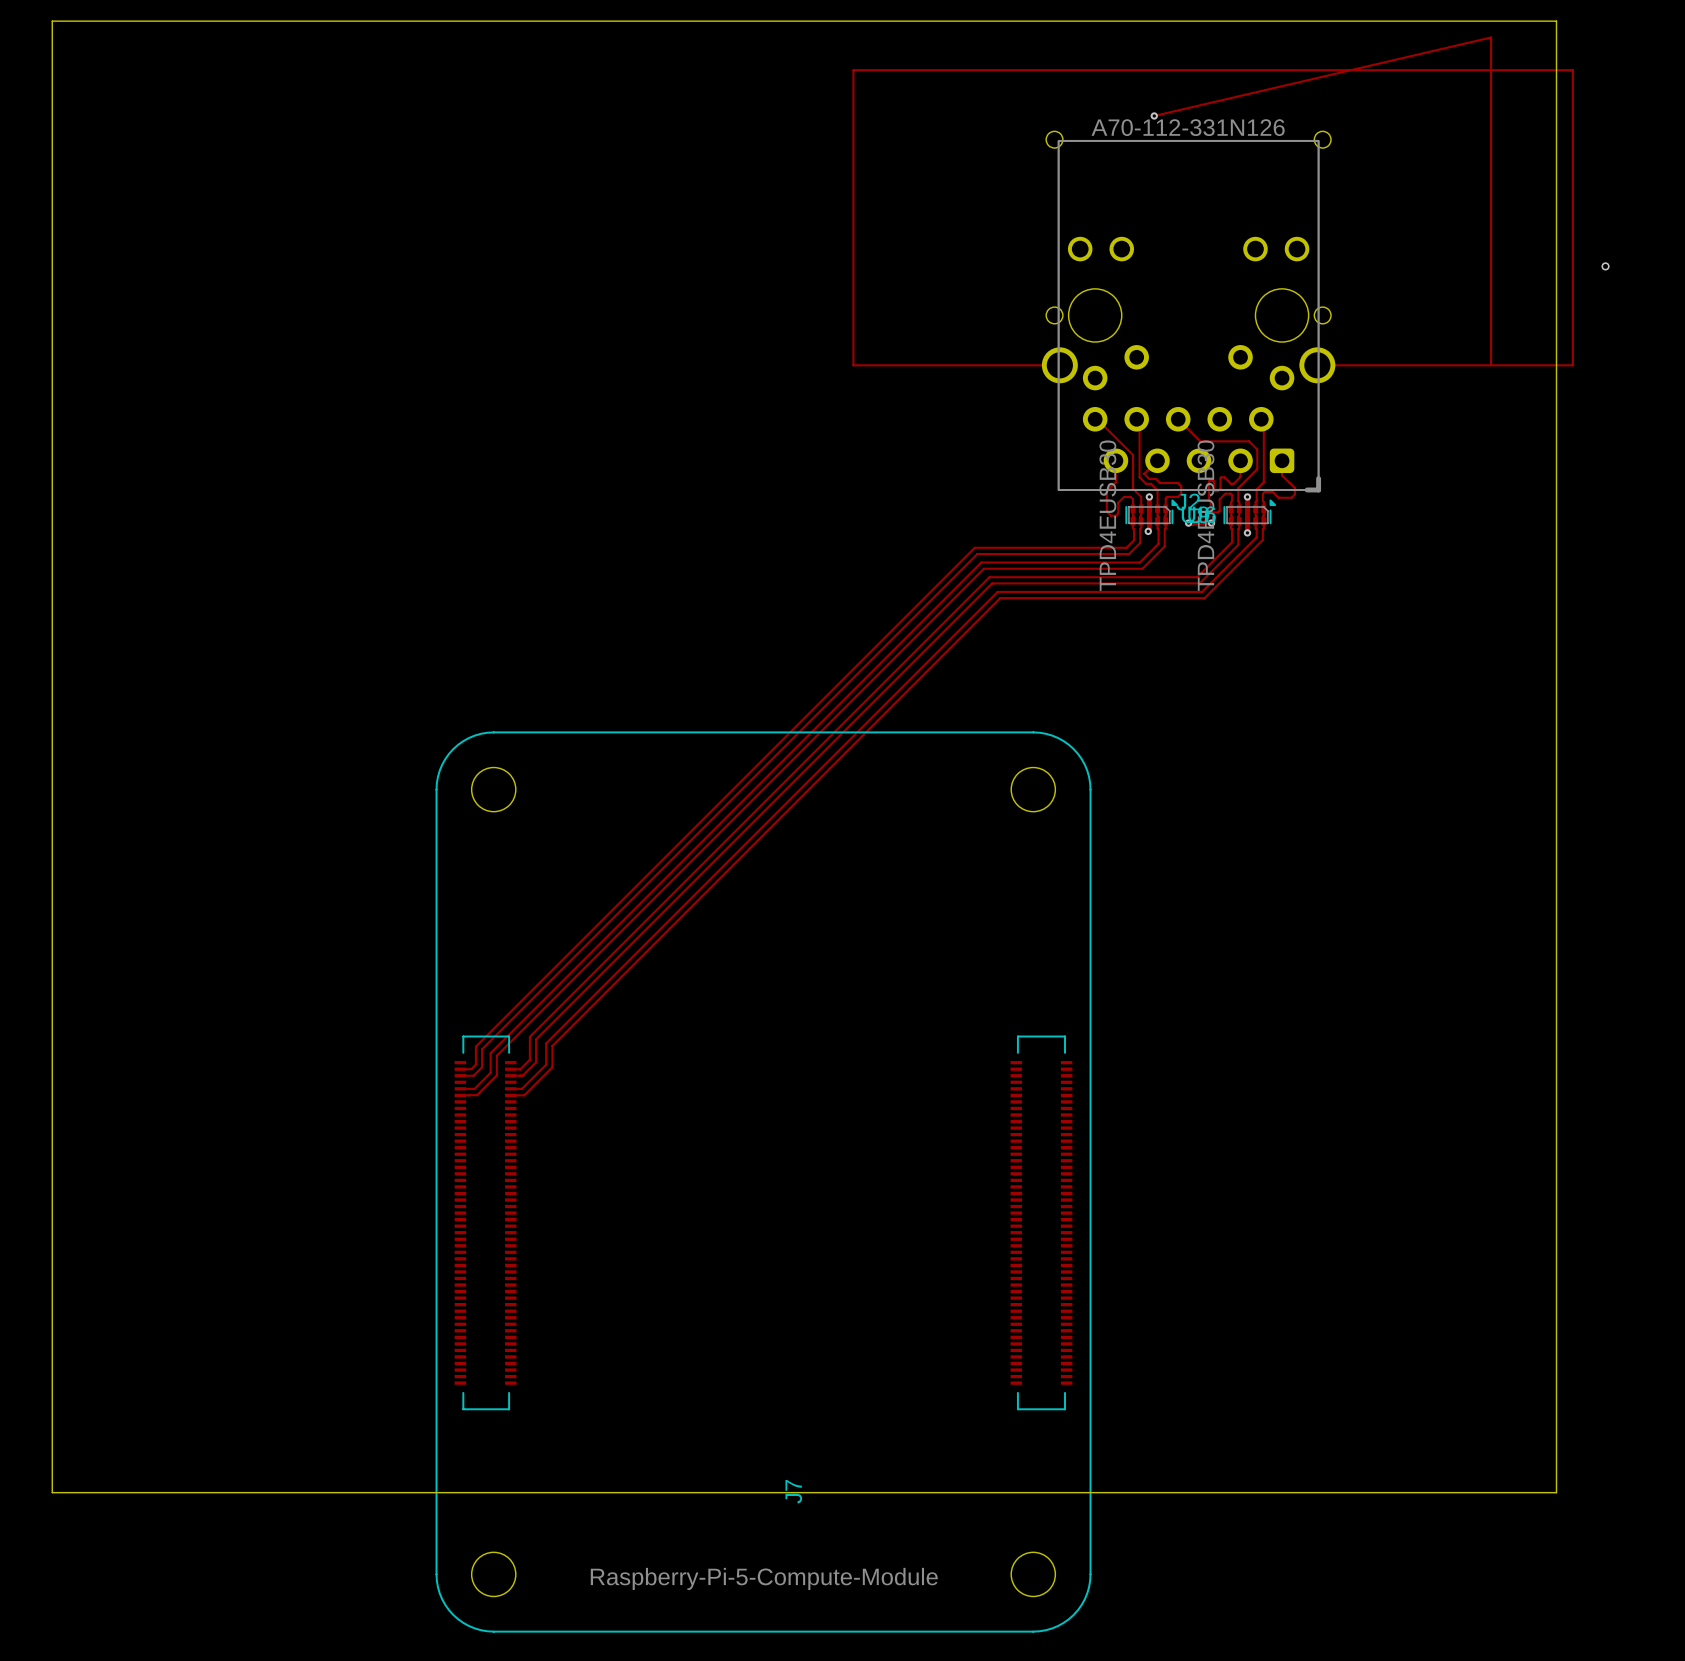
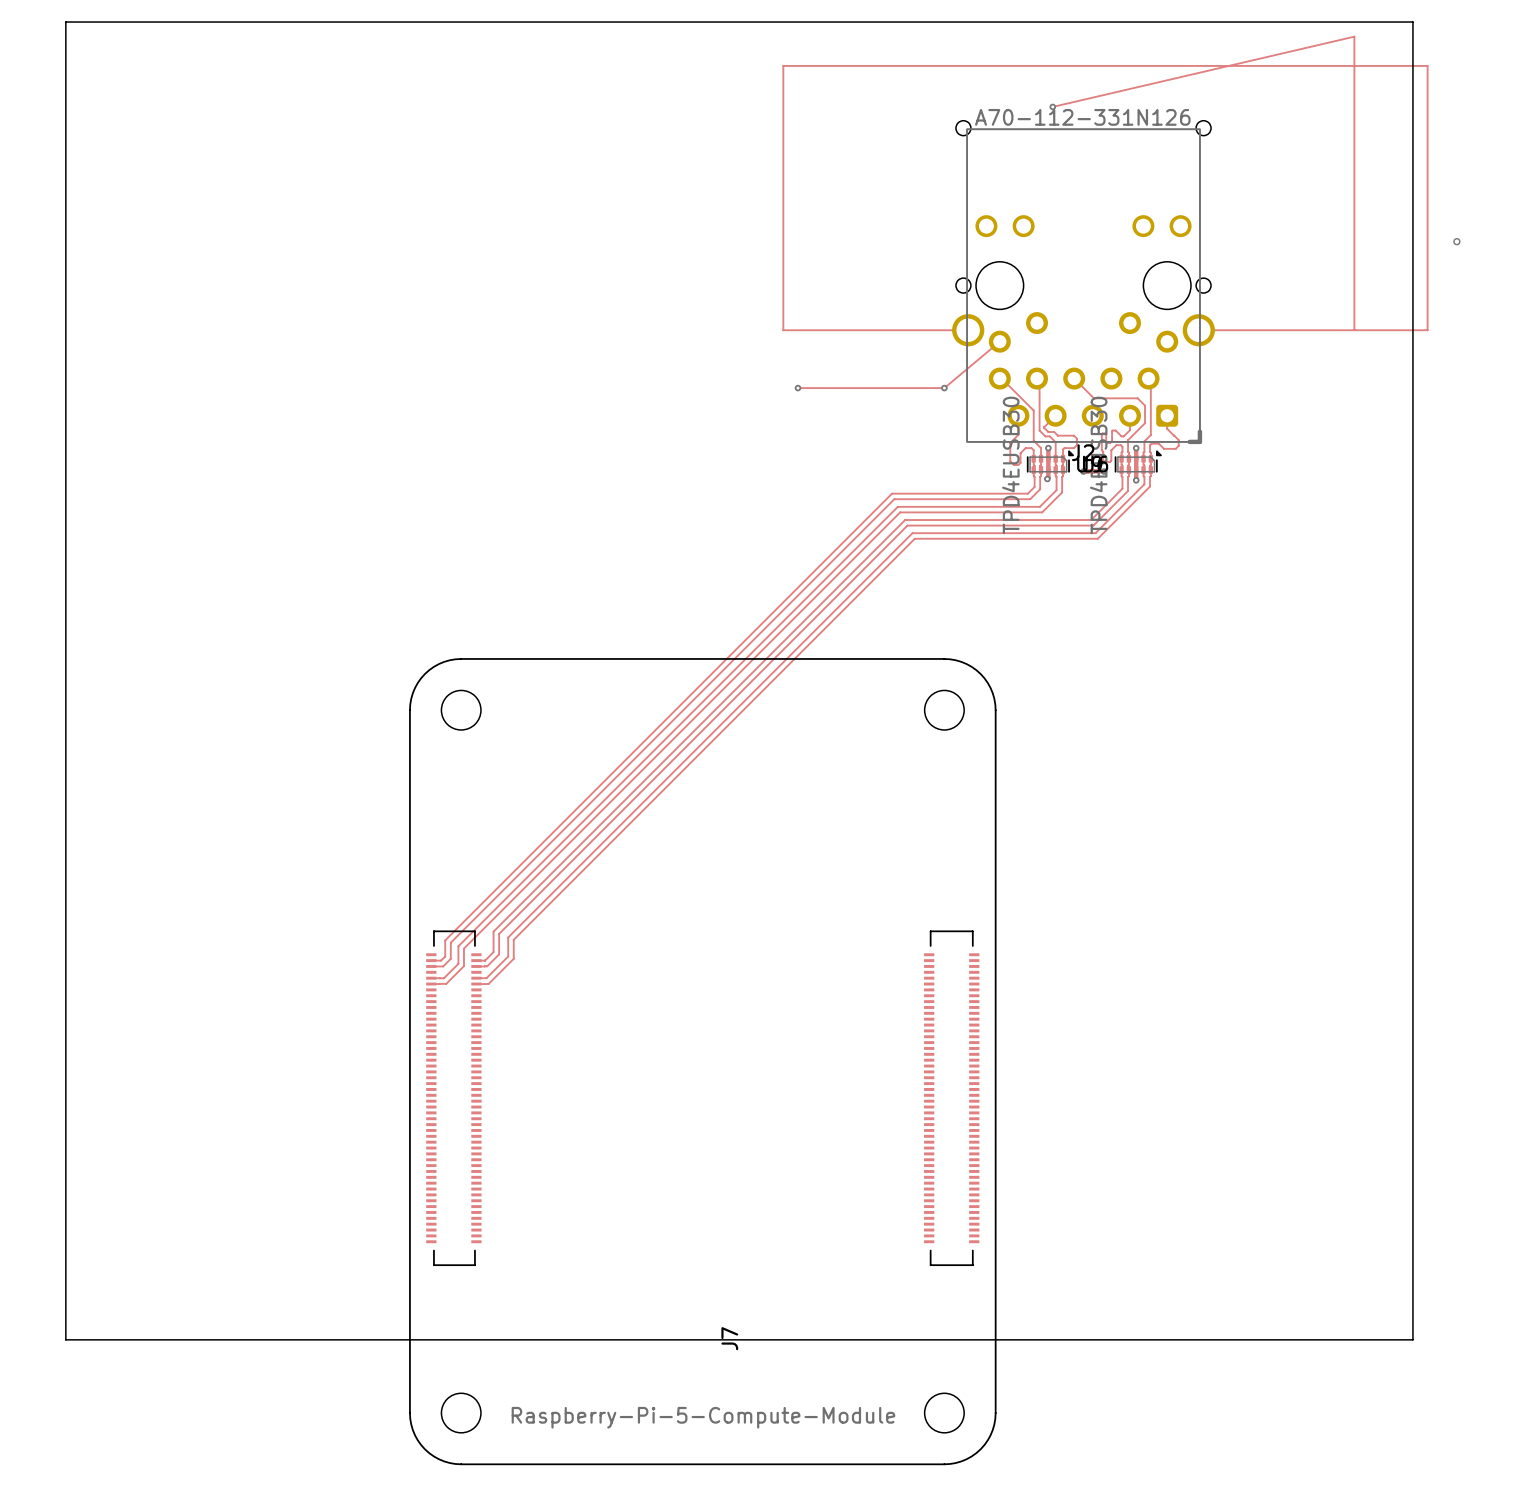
track: none -> (999, 341) (944, 388) (797, 388)
via: none -> (797, 388)
via: none -> (944, 388)

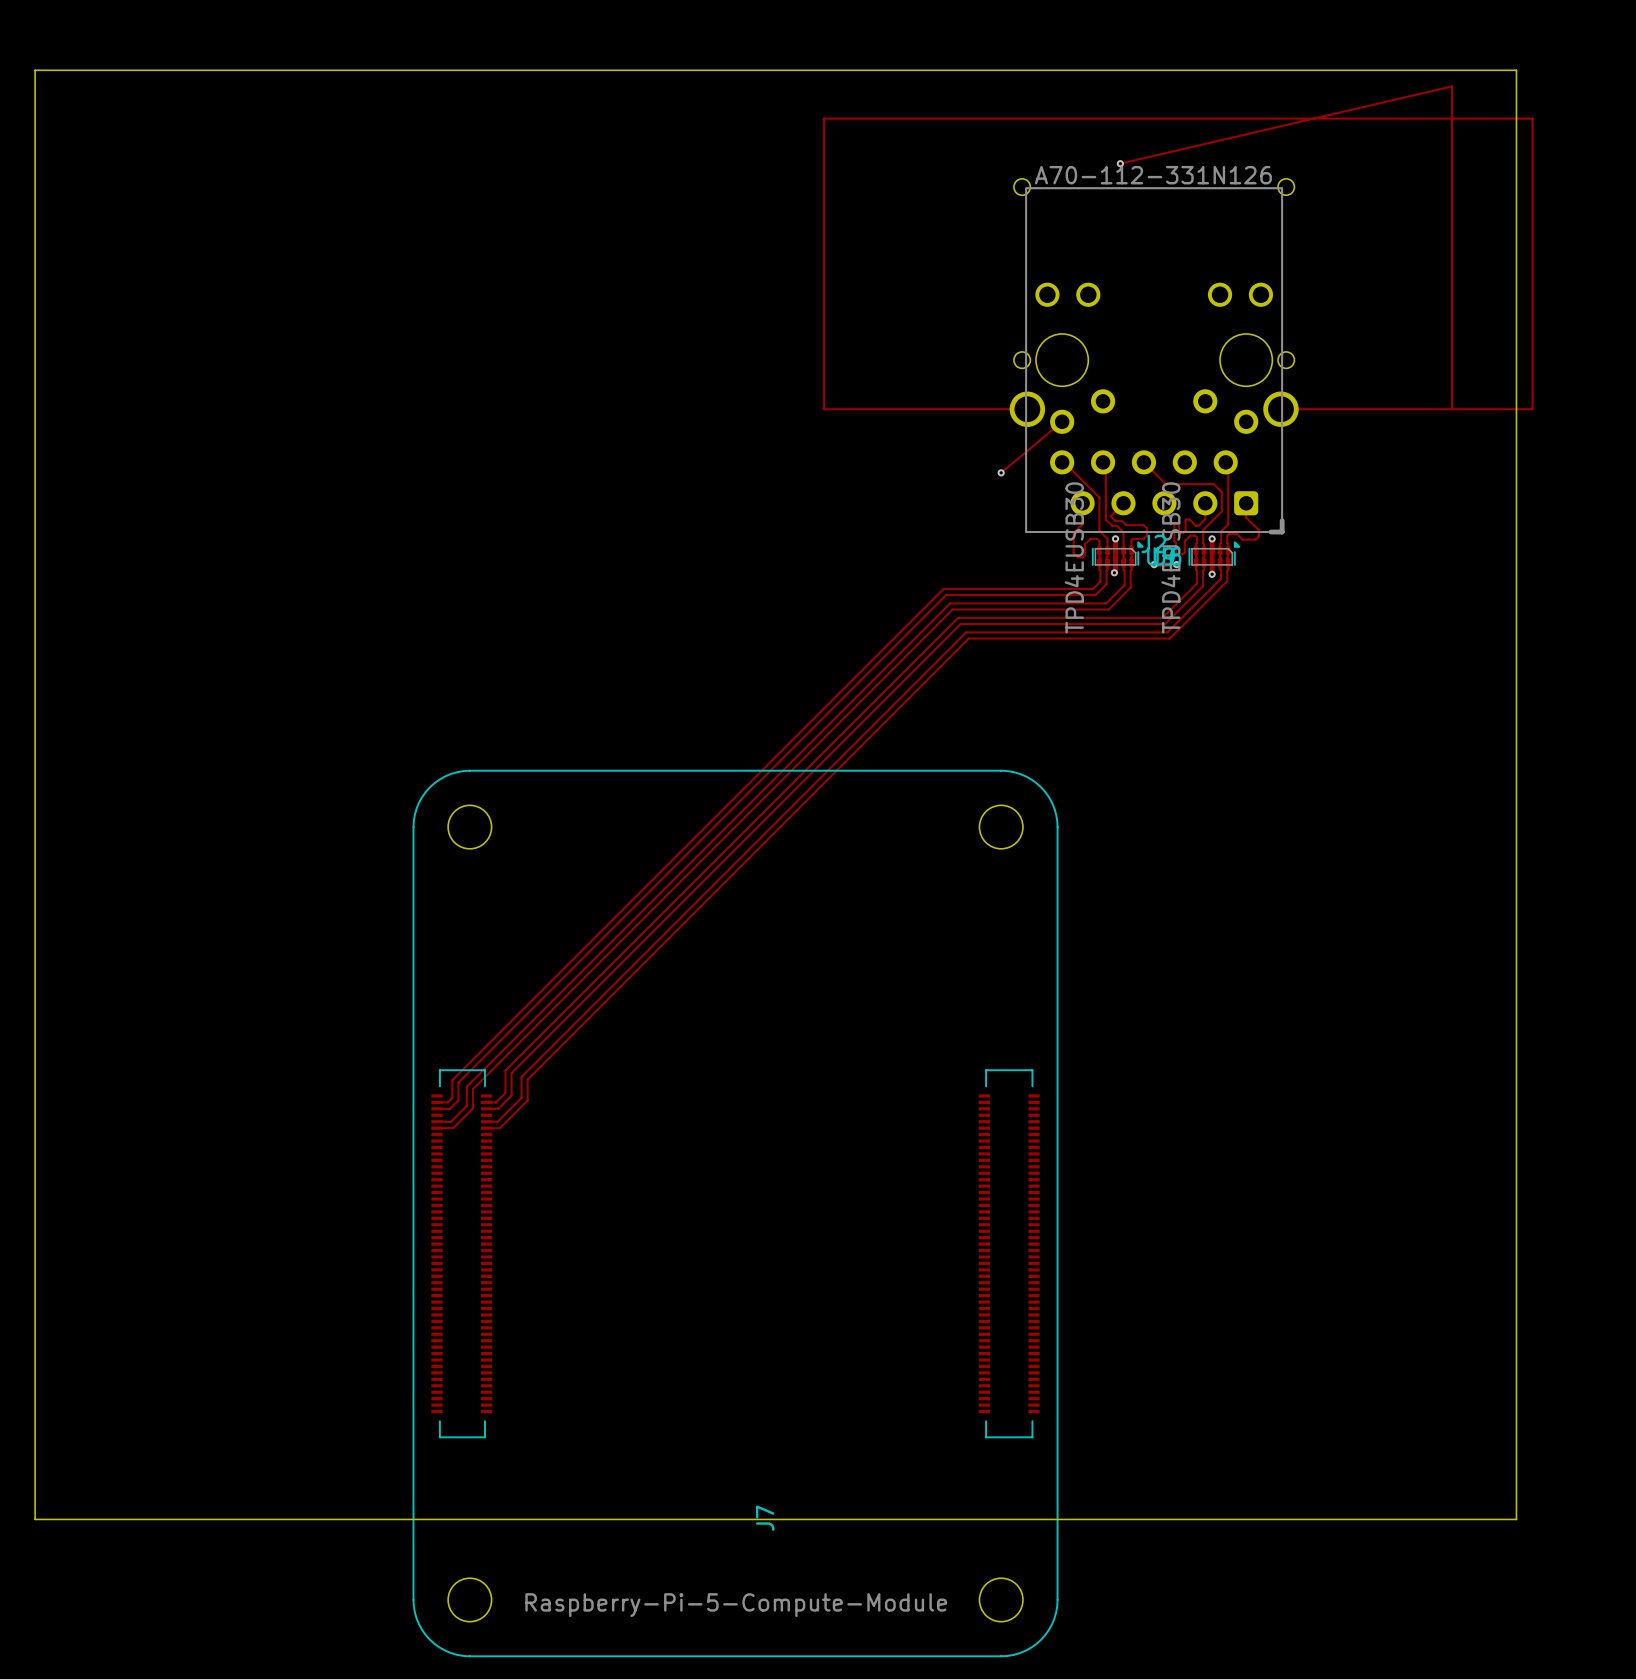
via: (1456, 241) -> none
track: (797, 388) (944, 388) -> none
via: (797, 388) -> none

